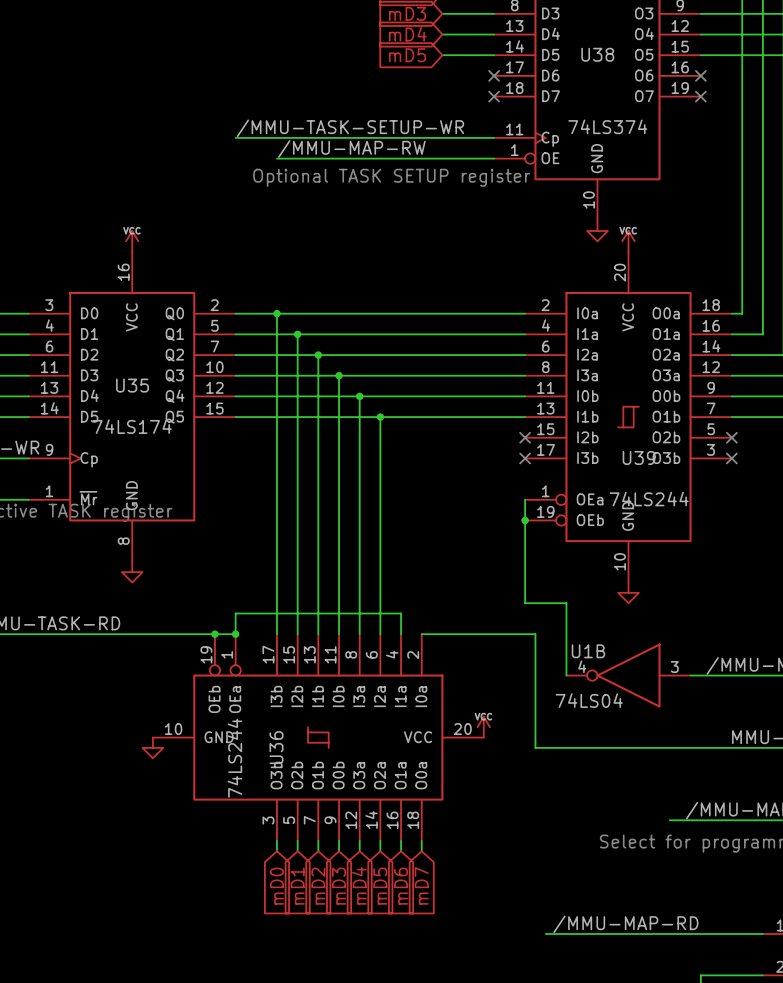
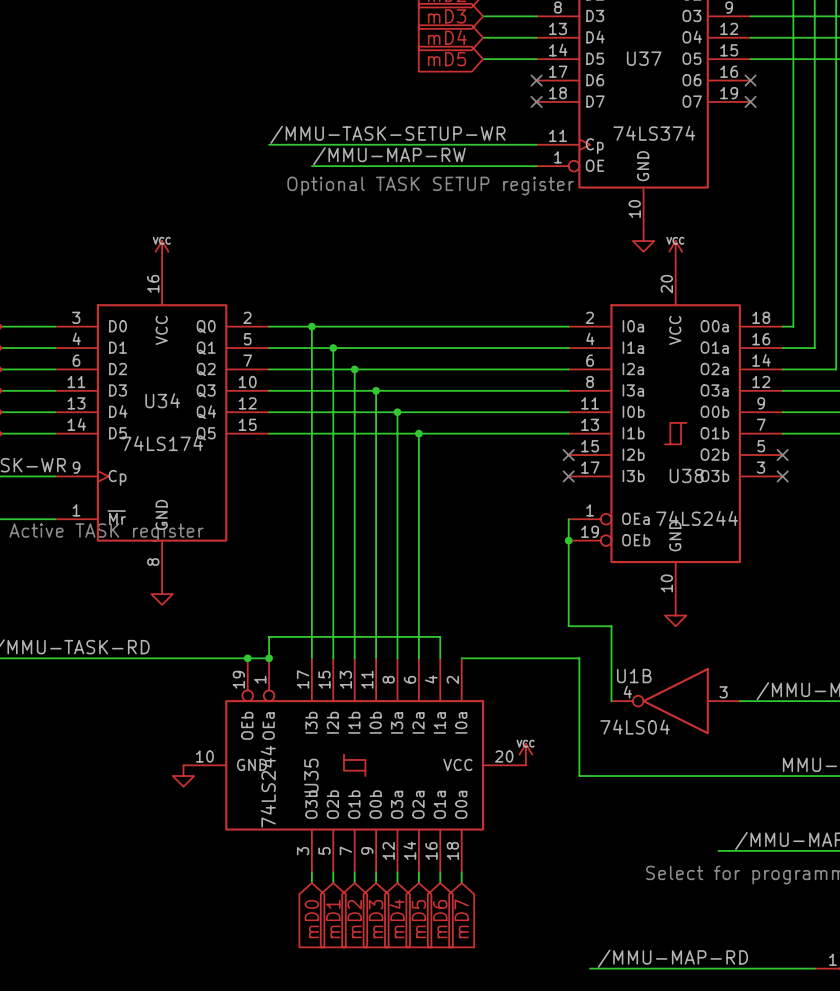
U38 name: U38 (597, 54) -> U37 (644, 58)
U35 name: U35 (132, 385) -> U34 (162, 400)
U39 name: U39 (639, 457) -> U38 (686, 475)
U36 name: U36 (276, 747) -> U35 (311, 775)

